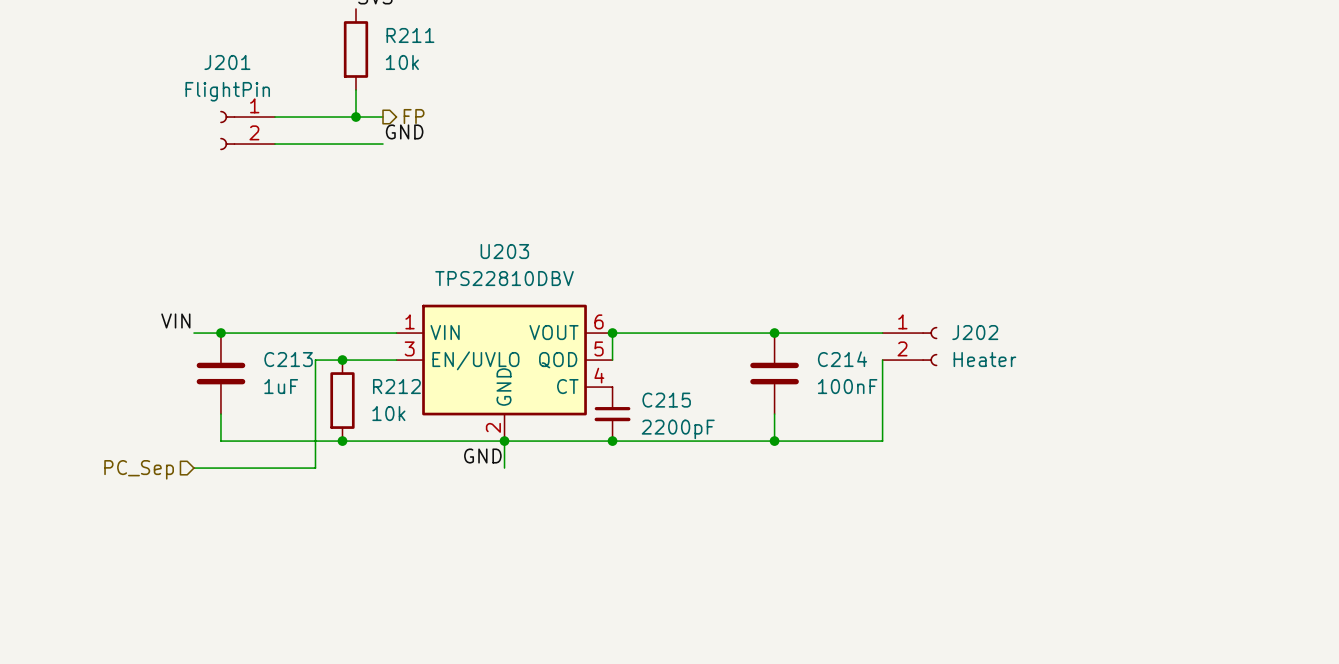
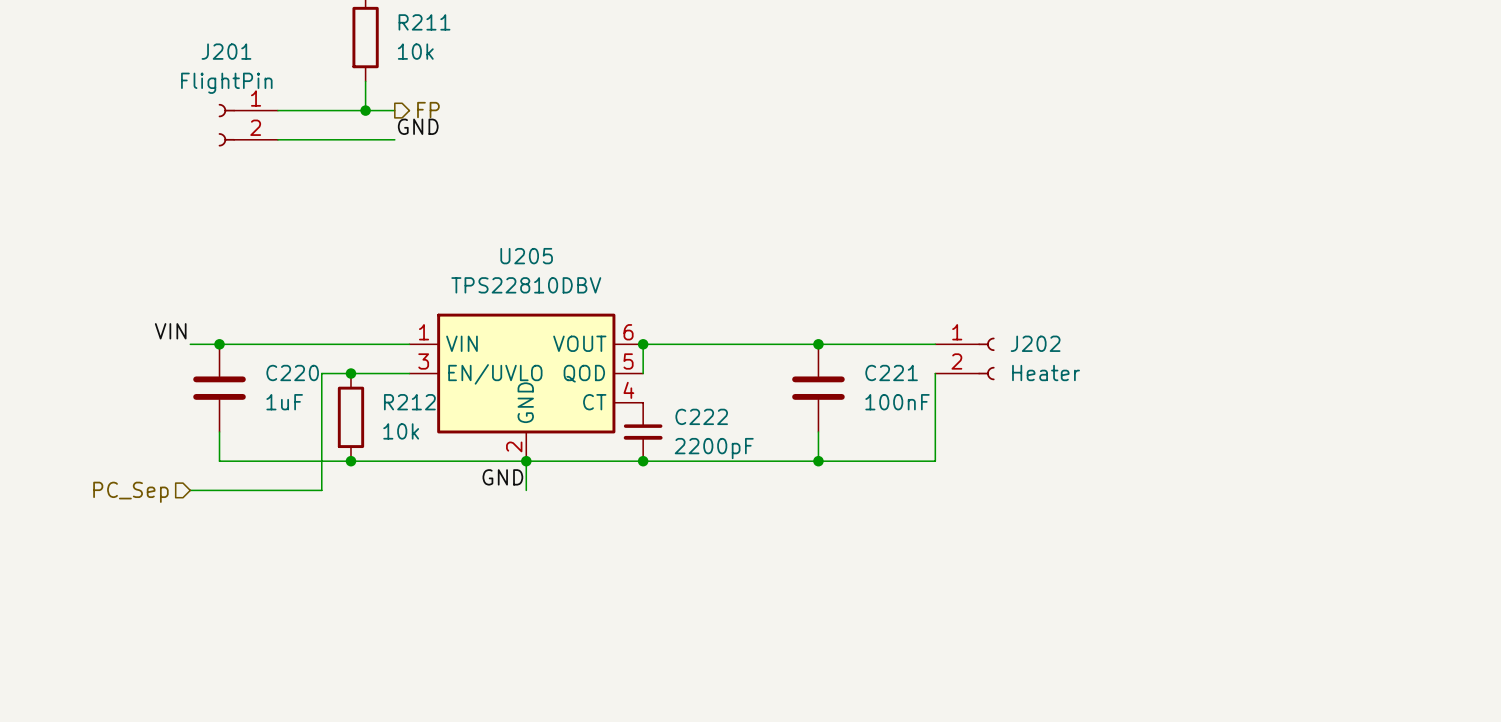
U203 name: U203 (504, 251) -> U205 (526, 256)
C213 name: C213 (288, 359) -> C220 (292, 372)
C214 name: C214 (842, 359) -> C221 (891, 372)
C215 name: C215 (666, 400) -> C222 (701, 416)

